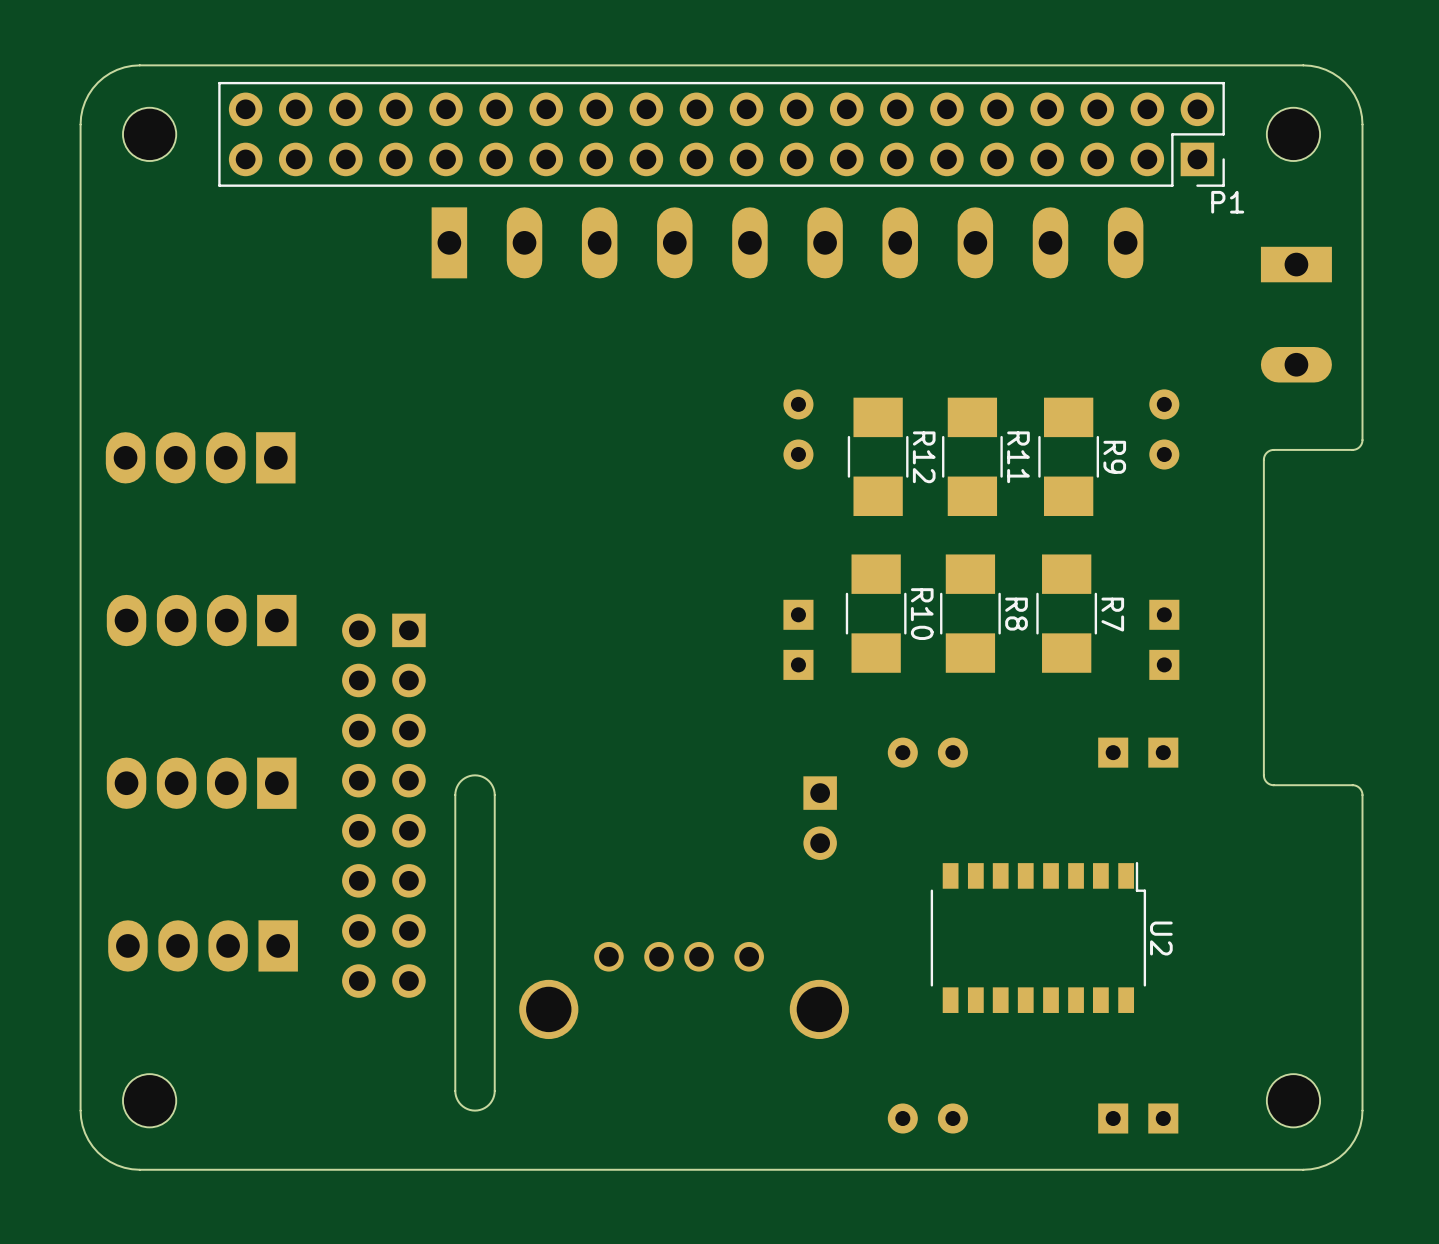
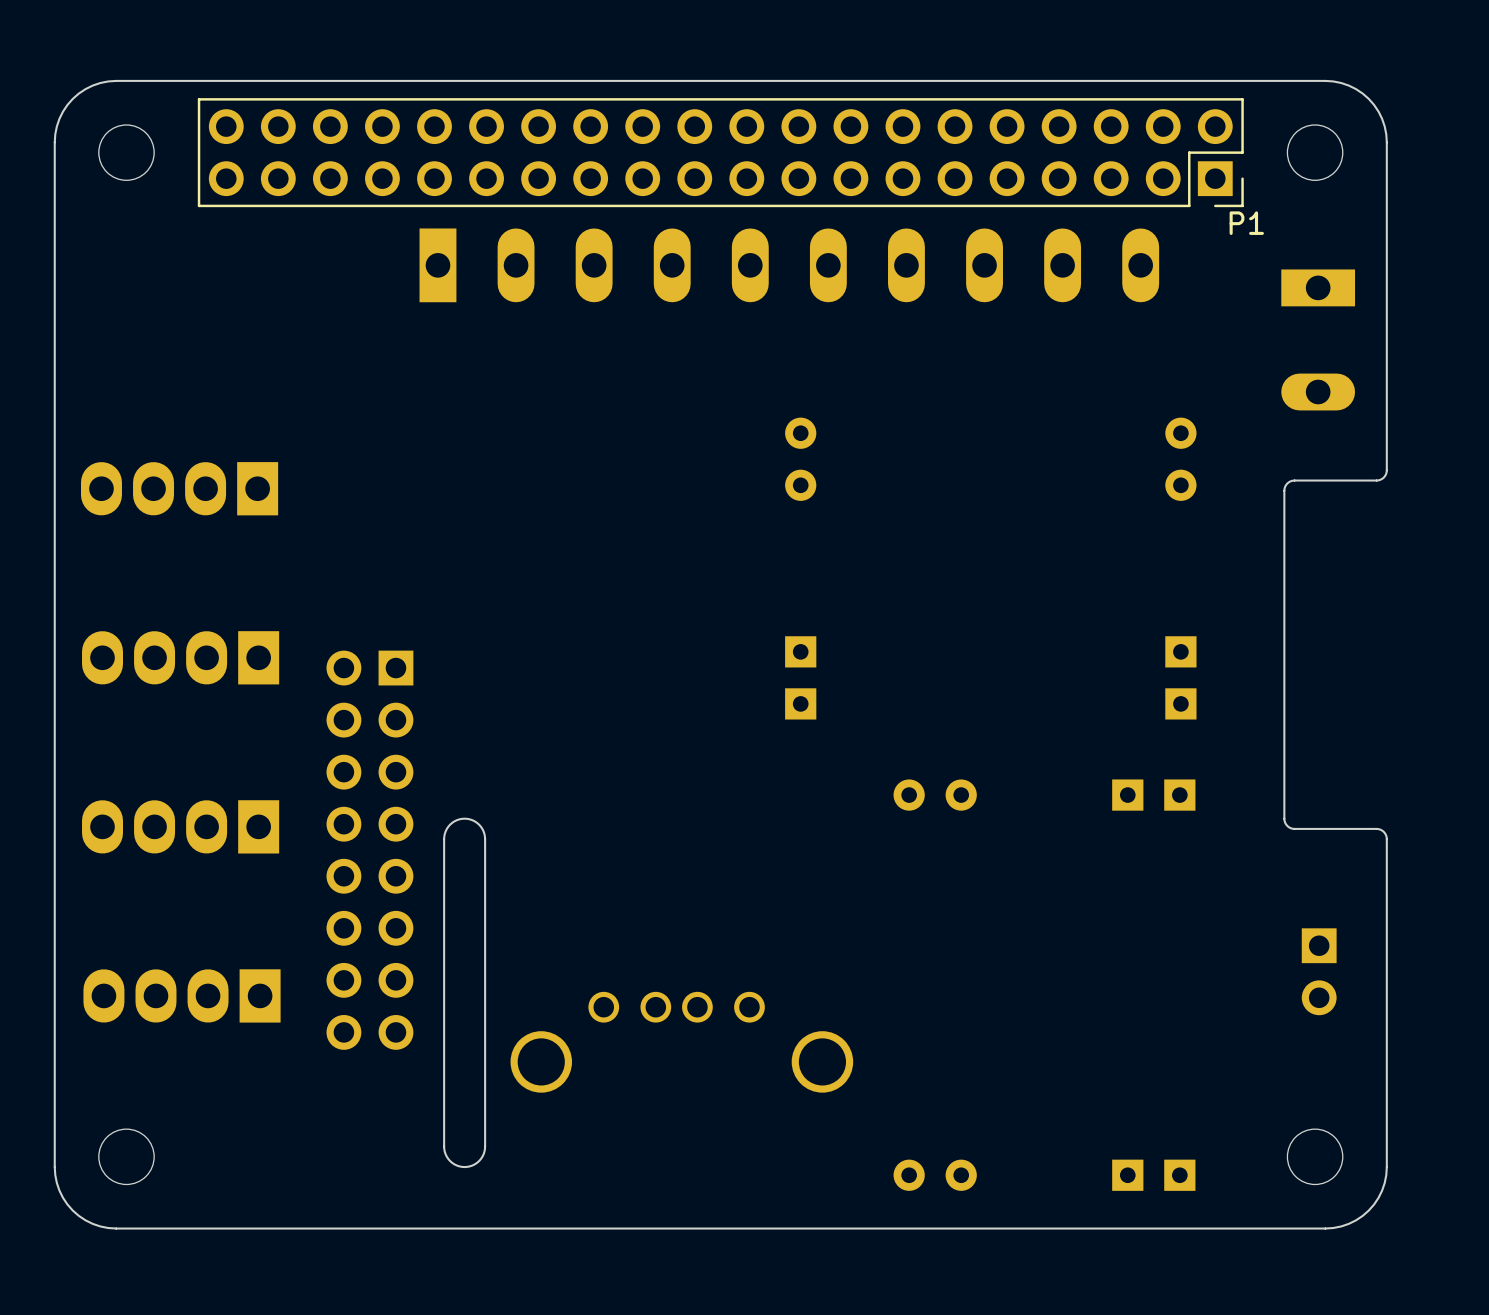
R12: (878, 456) -> none
R11: (972, 456) -> none
R9: (1068, 456) -> none
R10: (876, 613) -> none
R8: (970, 613) -> none
R7: (1066, 613) -> none
part position: (820, 818) -> (1319, 971)
U2: (1038, 937) -> none

